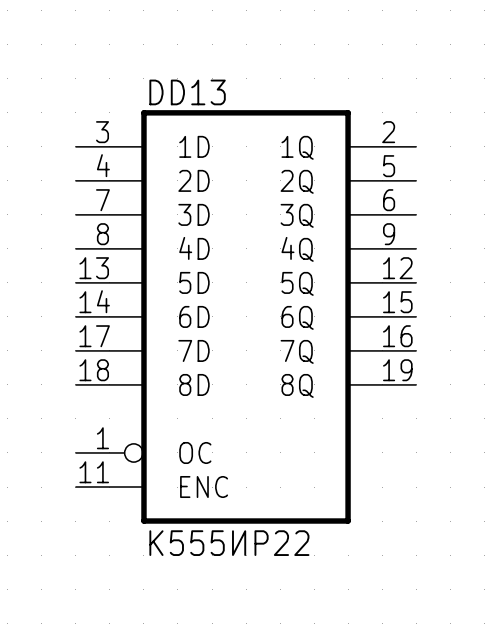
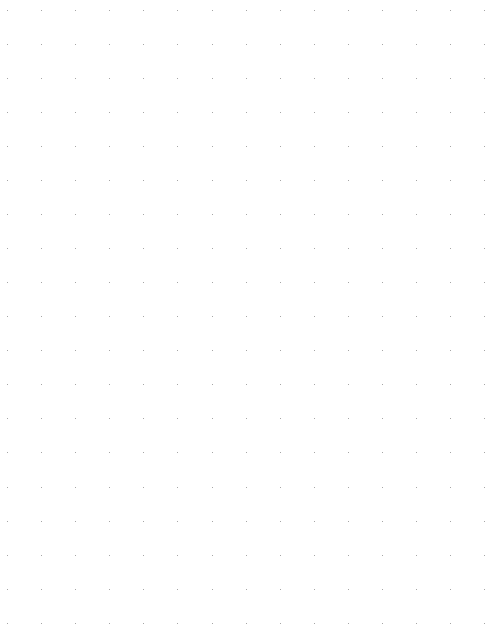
DD13: К555ИР22 (246, 316) -> none

